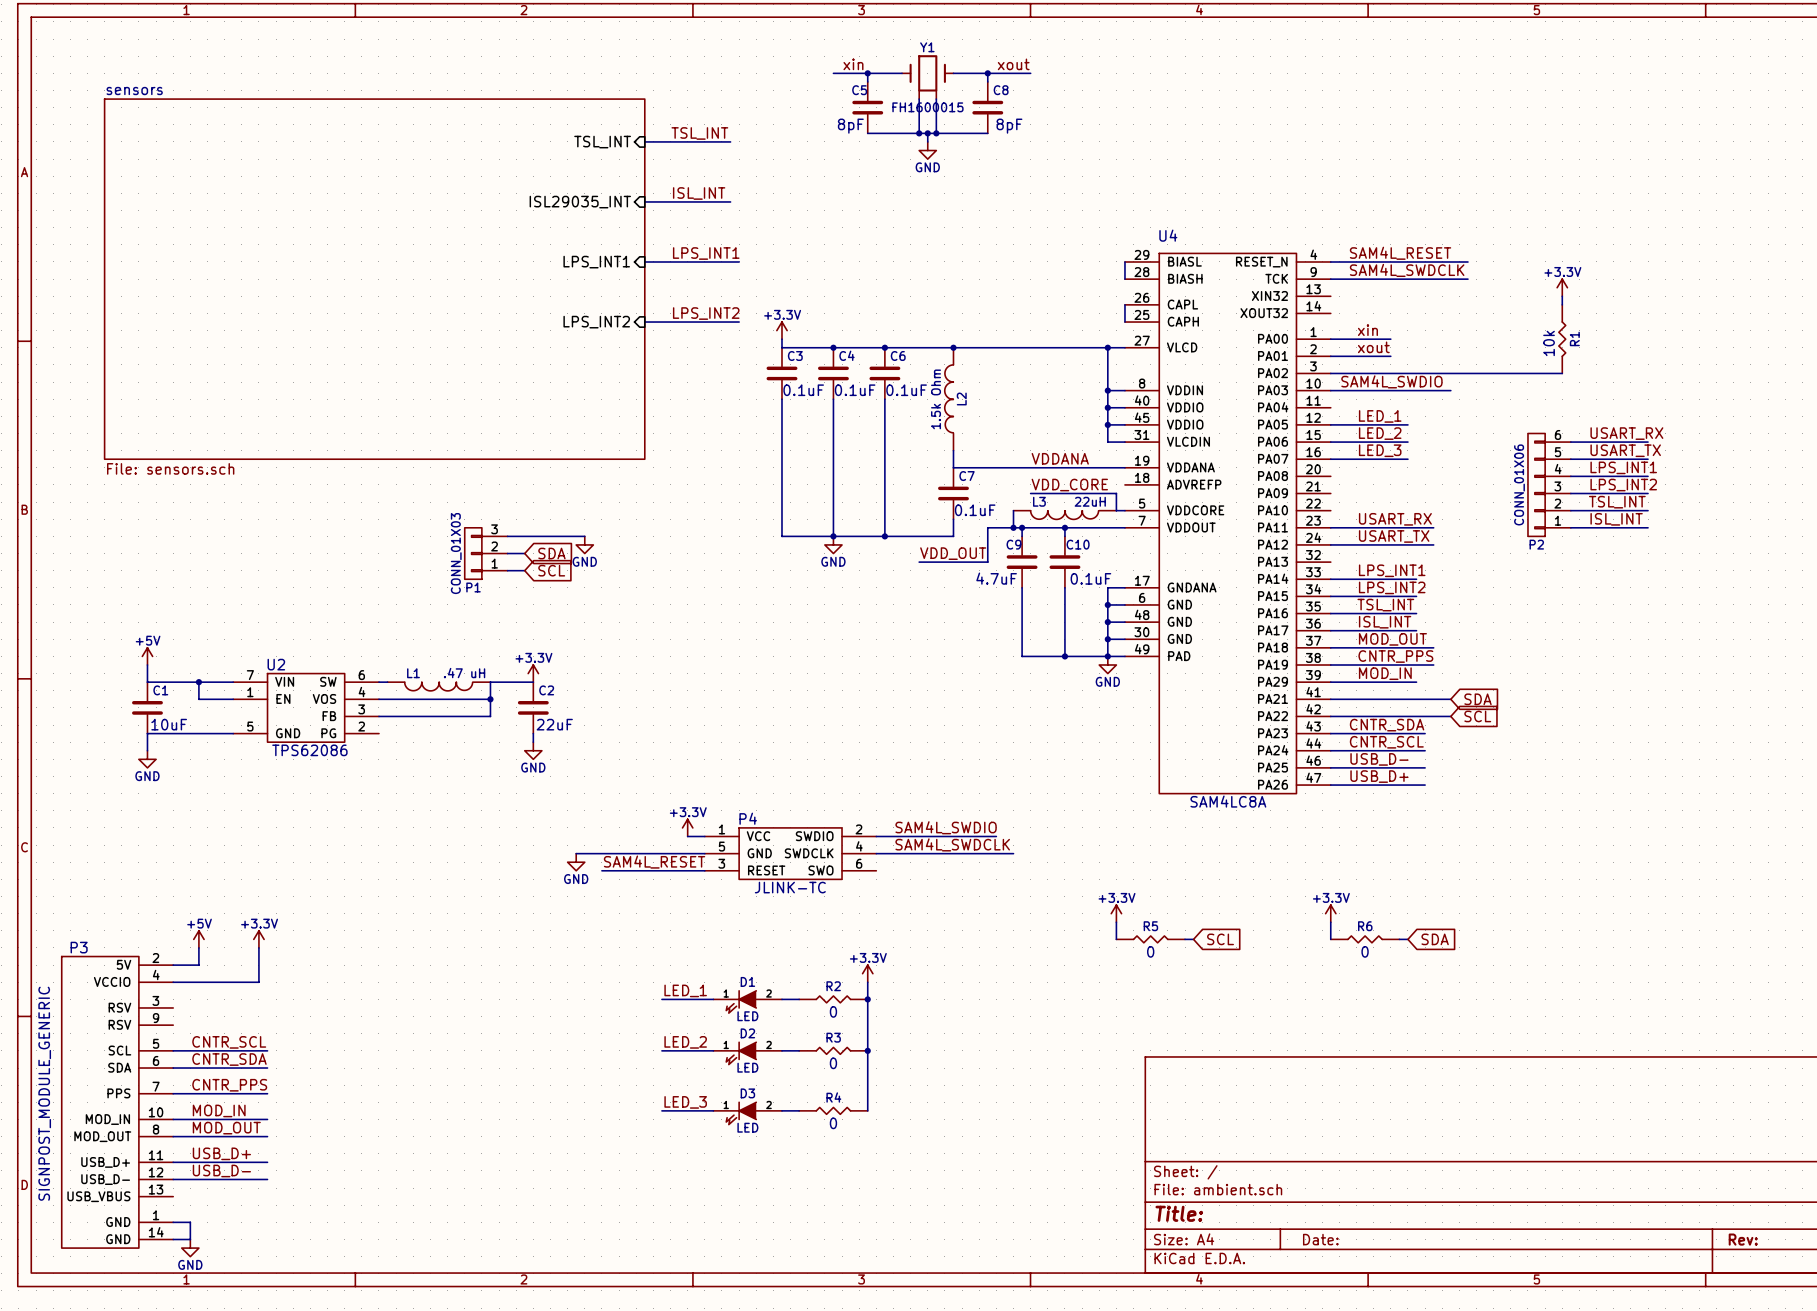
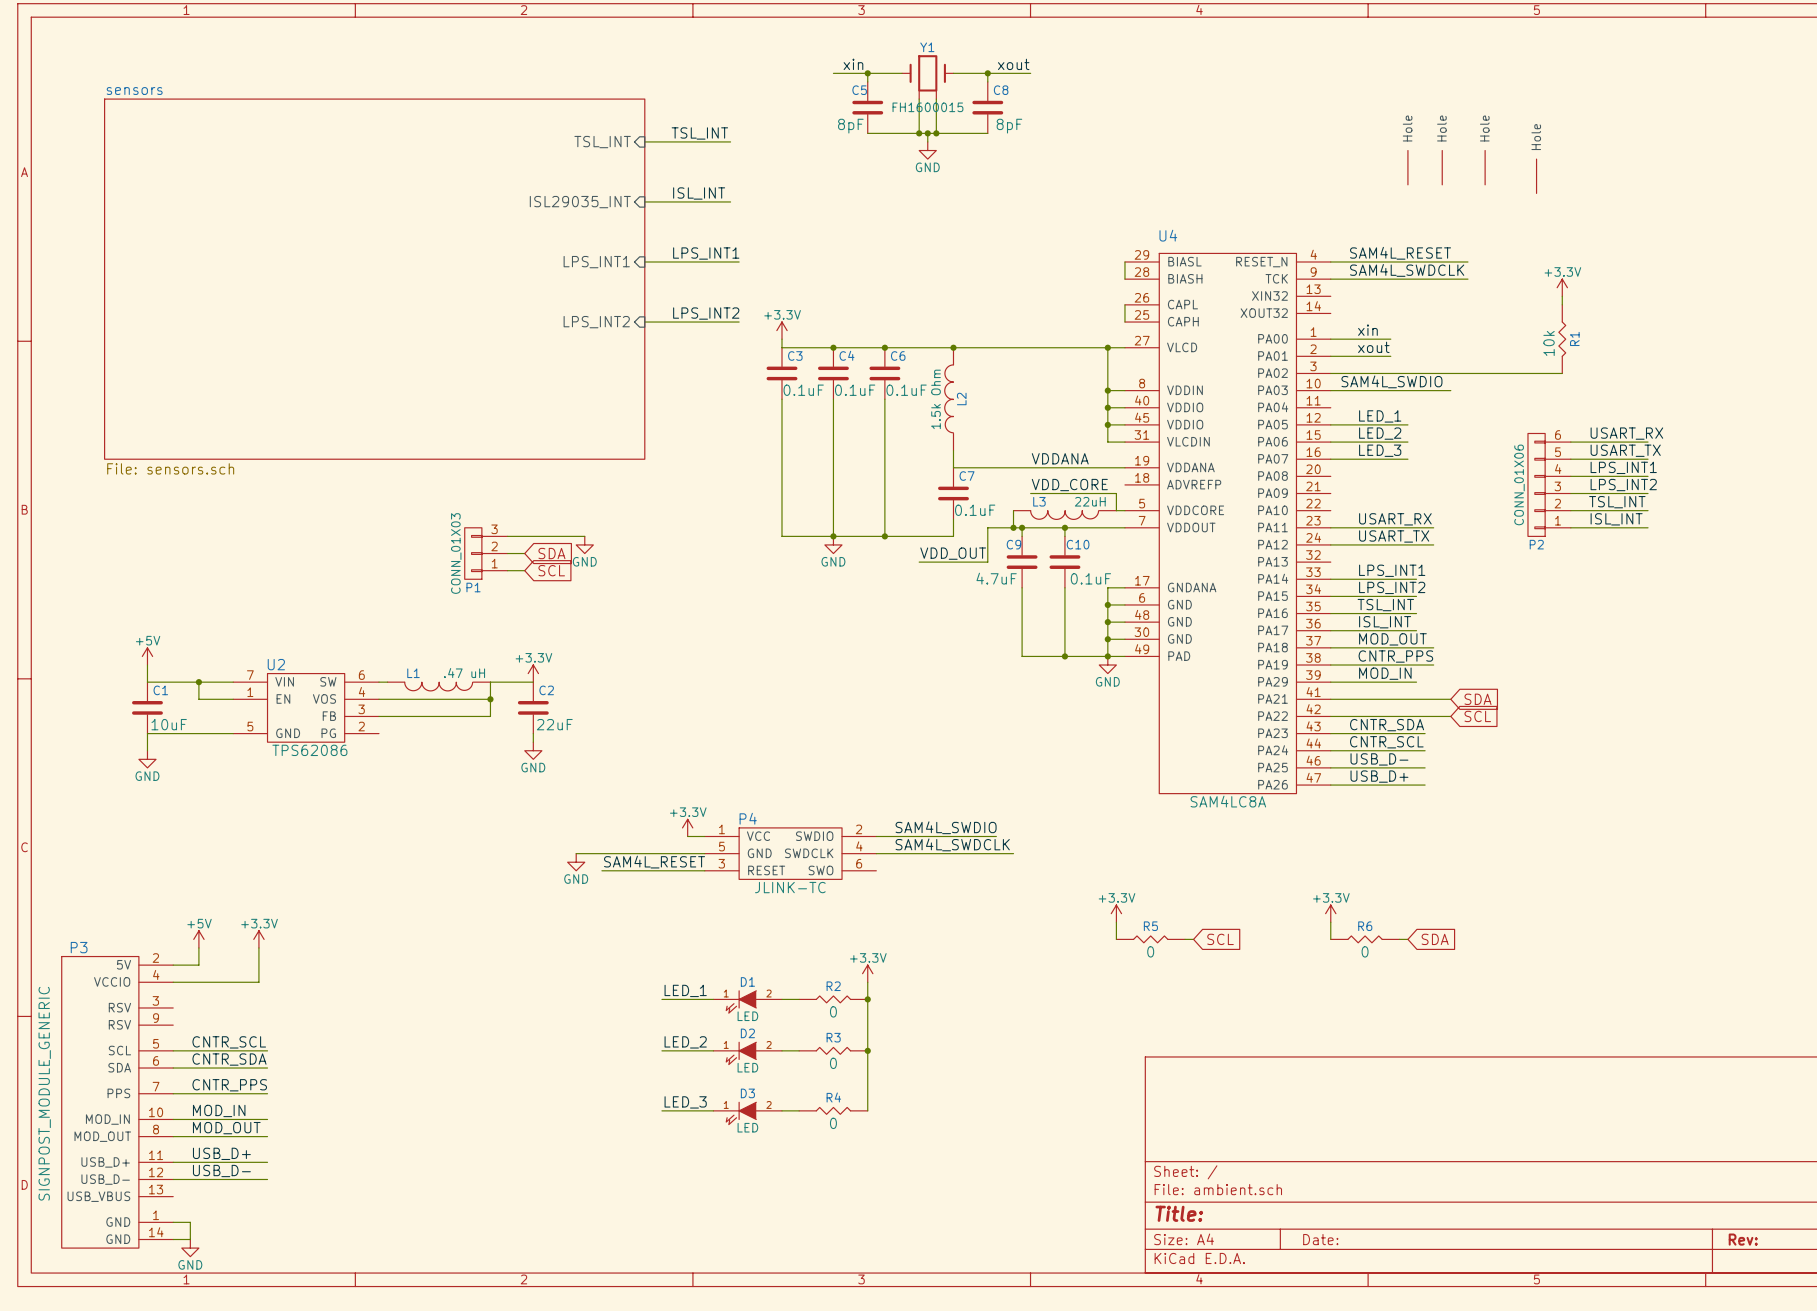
part: none -> (1407, 167)
part: none -> (1442, 167)
part: none -> (1485, 167)
part: none -> (1536, 176)

